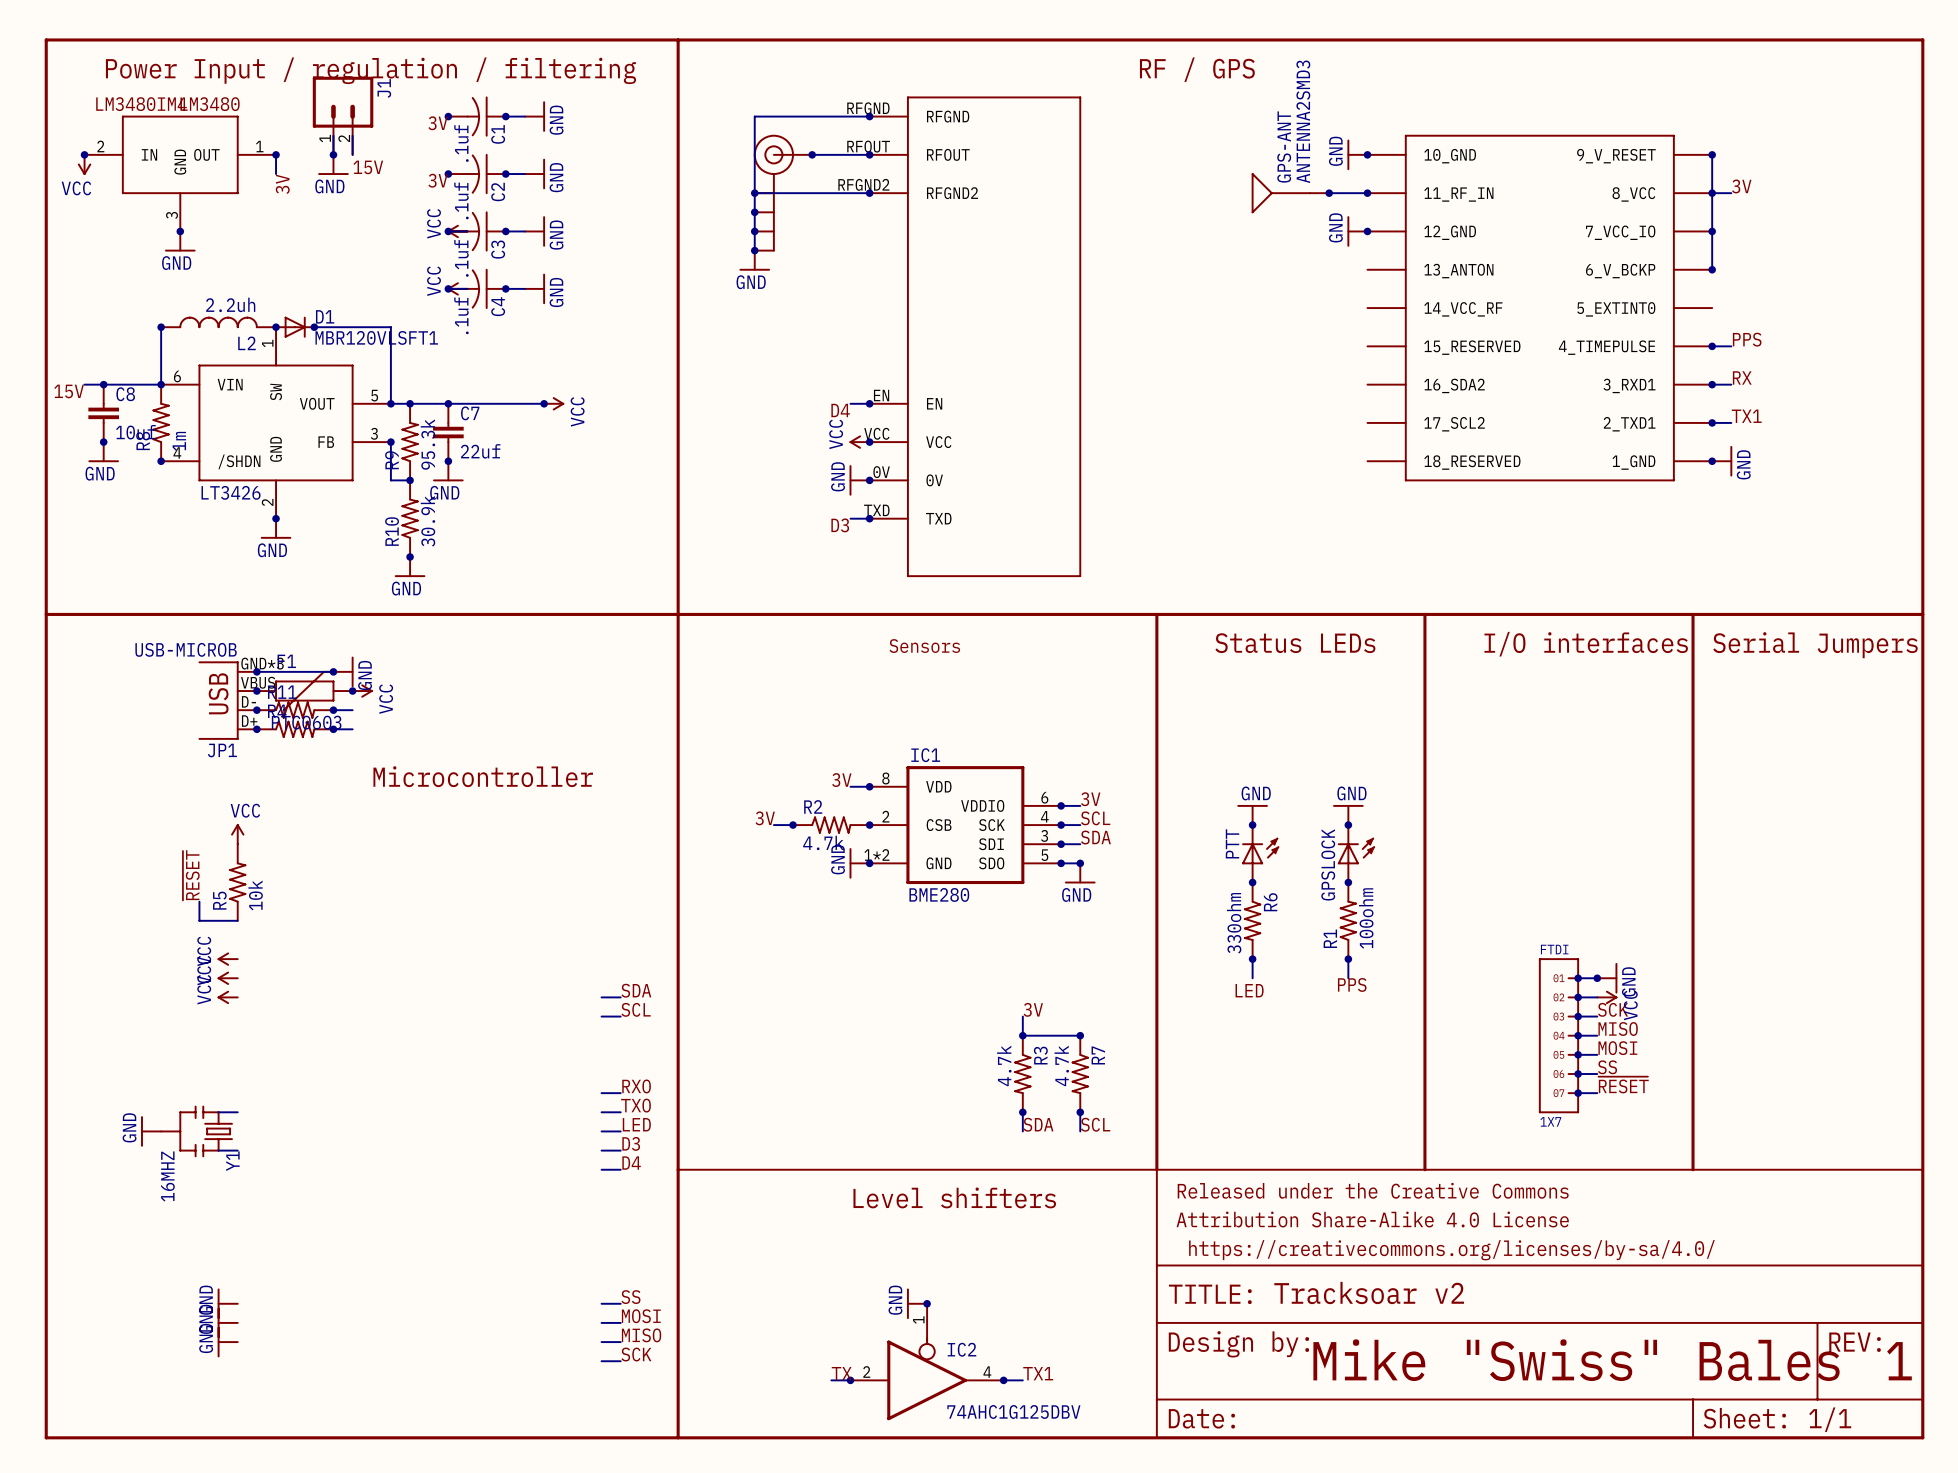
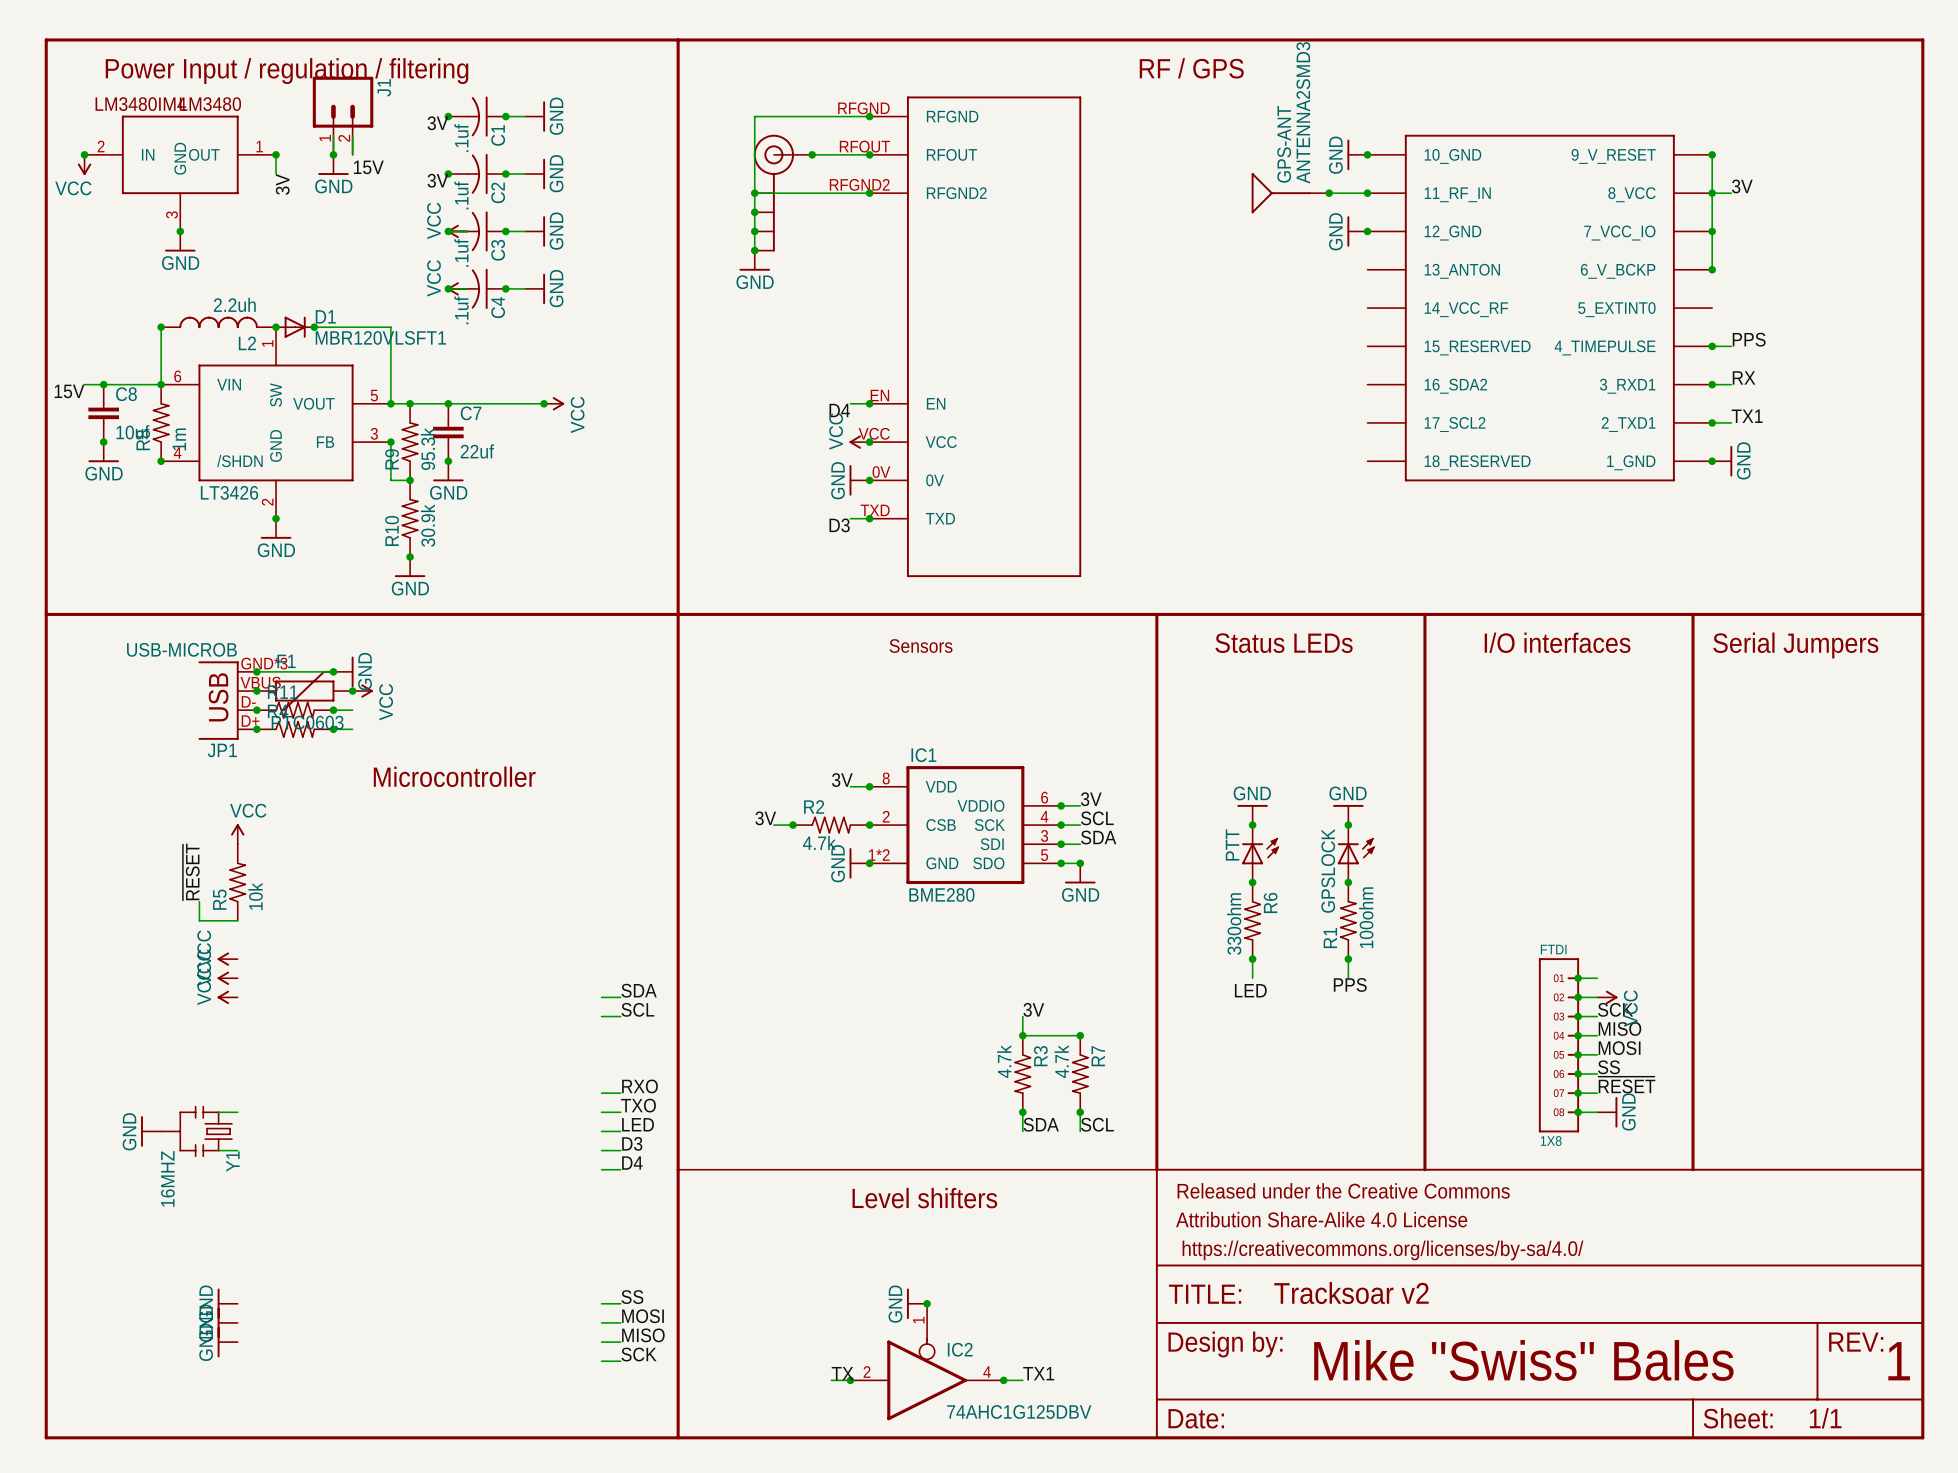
junction: (1597, 978) -> none
power symbol position: GND (1607, 978) -> GND (1607, 1112)
FTDI: 1X7 (1558, 1035) -> none
FTDI: none -> 1X8 (1558, 1045)
wire: none -> (1578, 1112) (1597, 1112)
junction: none -> (1578, 1112)

